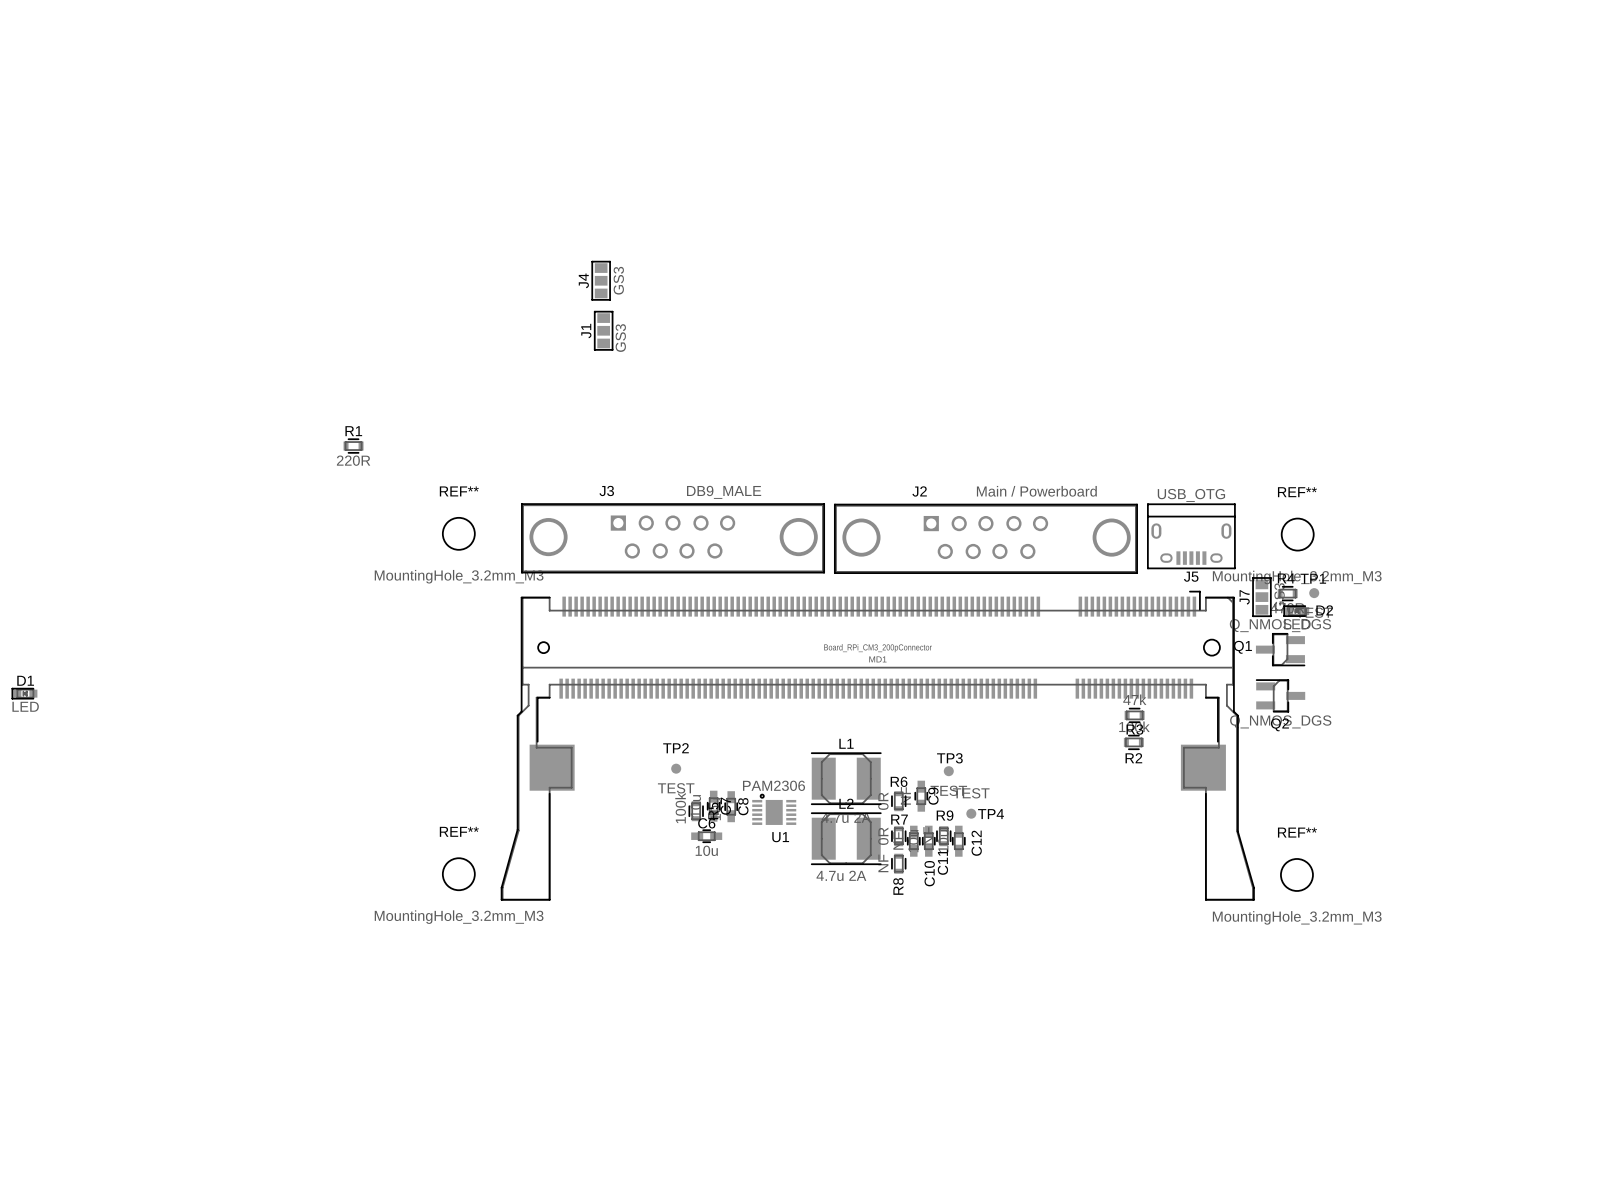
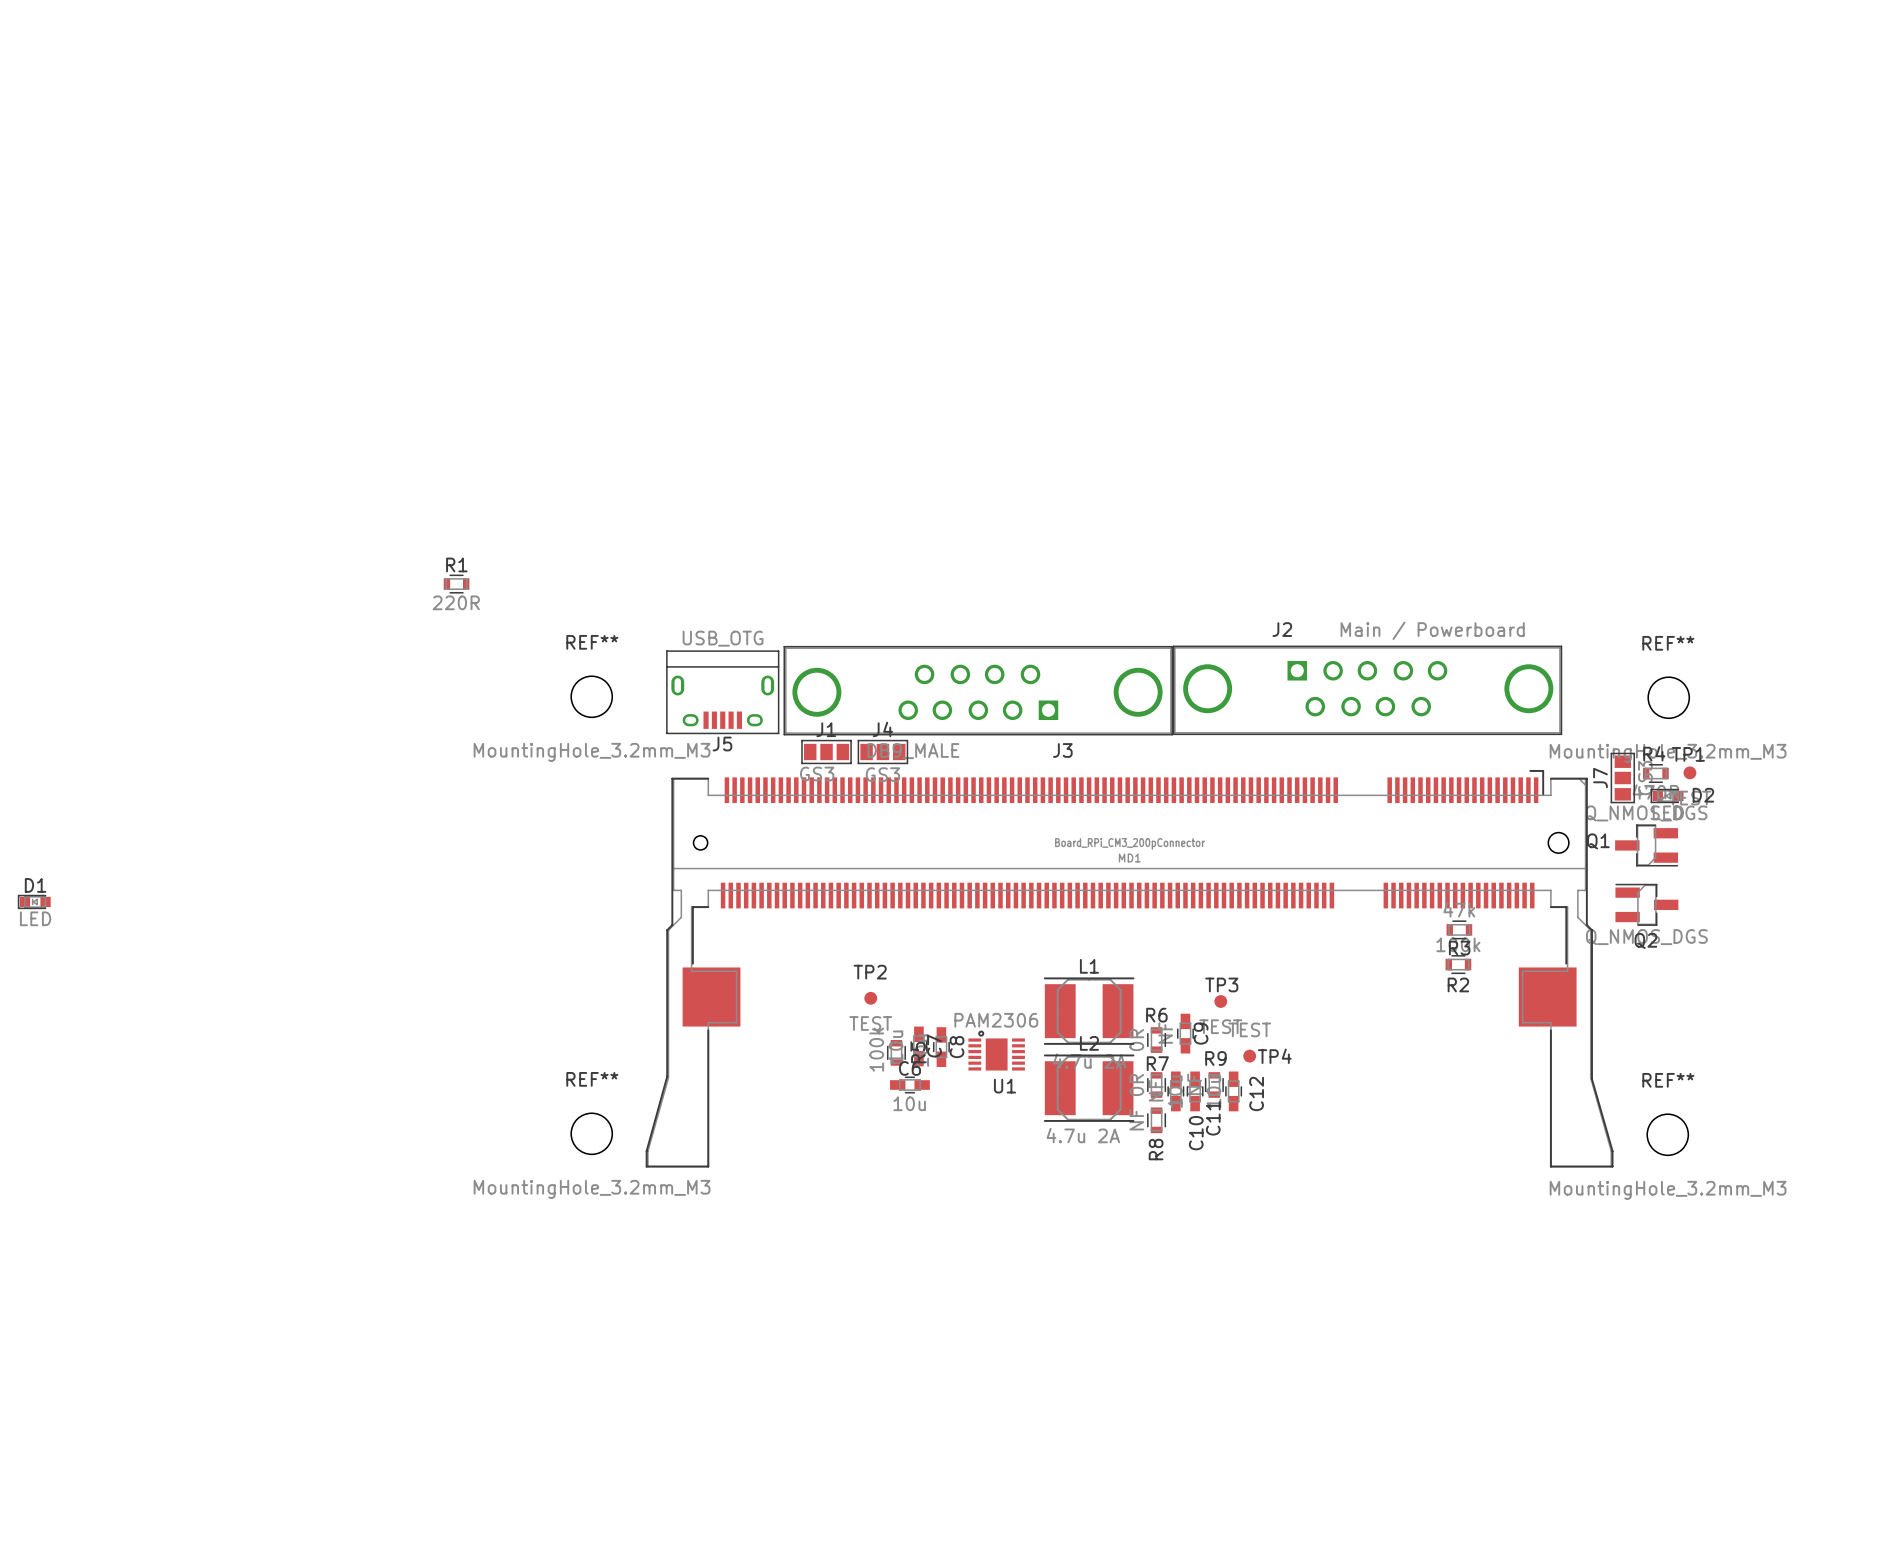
J4 rotation: 0° (601, 280) -> 90° clockwise (882, 752)
J4 position: (601, 280) -> (882, 752)
J1 rotation: 0° (603, 330) -> 90° clockwise (826, 752)
J1 position: (603, 330) -> (826, 752)
J5 position: (1191, 536) -> (722, 692)
J3 rotation: 0° (673, 538) -> 180° (978, 690)
J2 position: (985, 538) -> (1367, 690)

